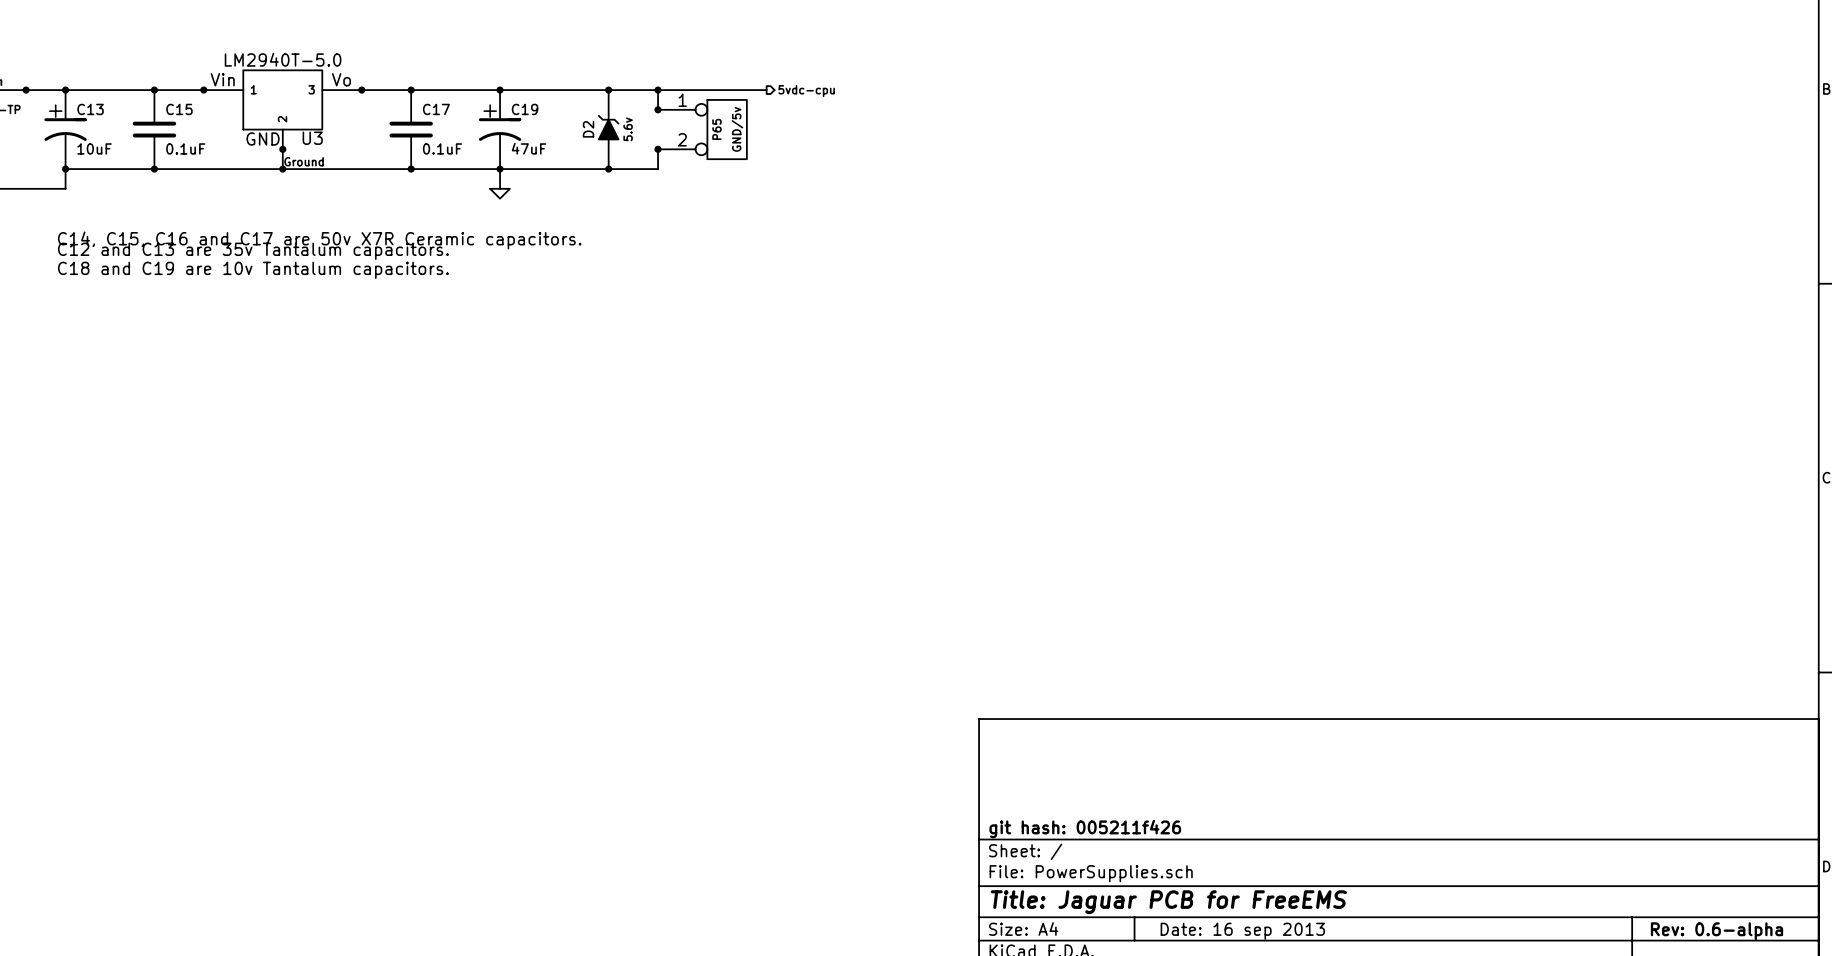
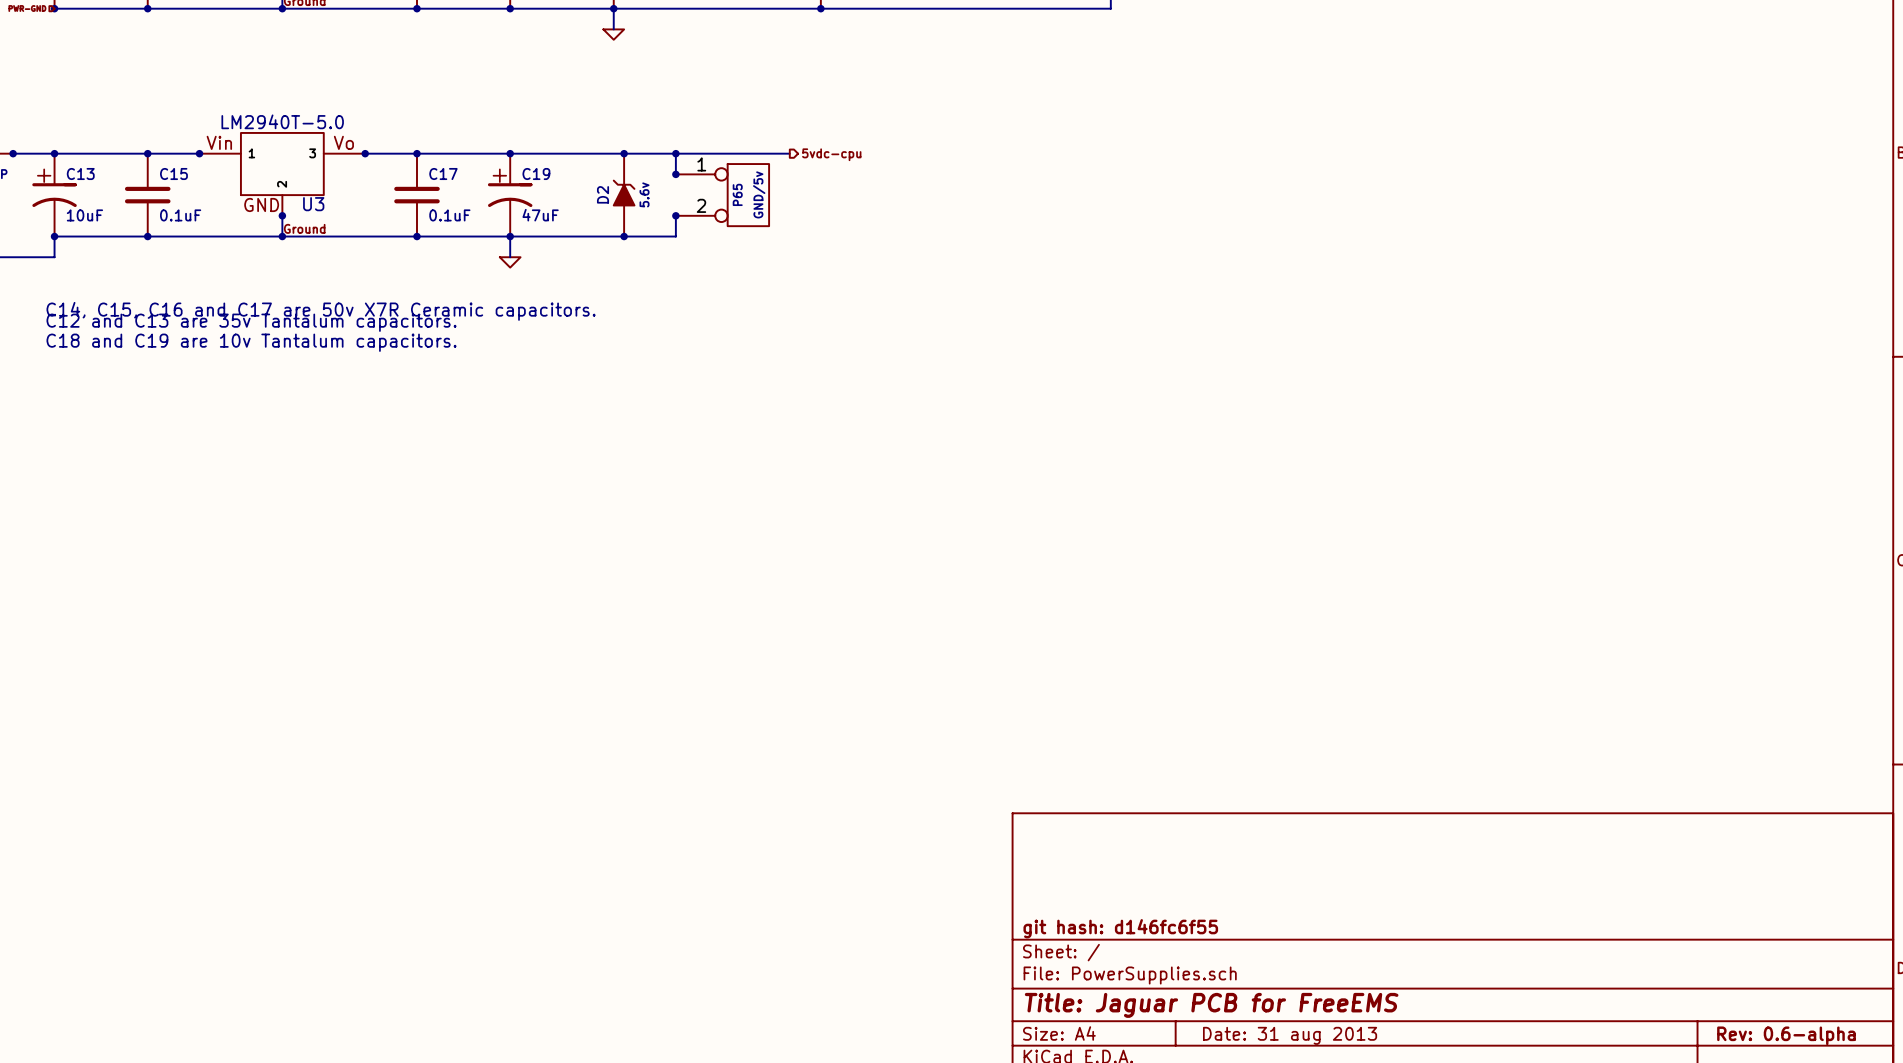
title block: git hash: 005211f426 (1085, 829) -> git hash: d146fc6f55 (1120, 928)
title block: Date: 16 sep 2013 (1242, 931) -> Date: 31 aug 2013 (1290, 1035)

